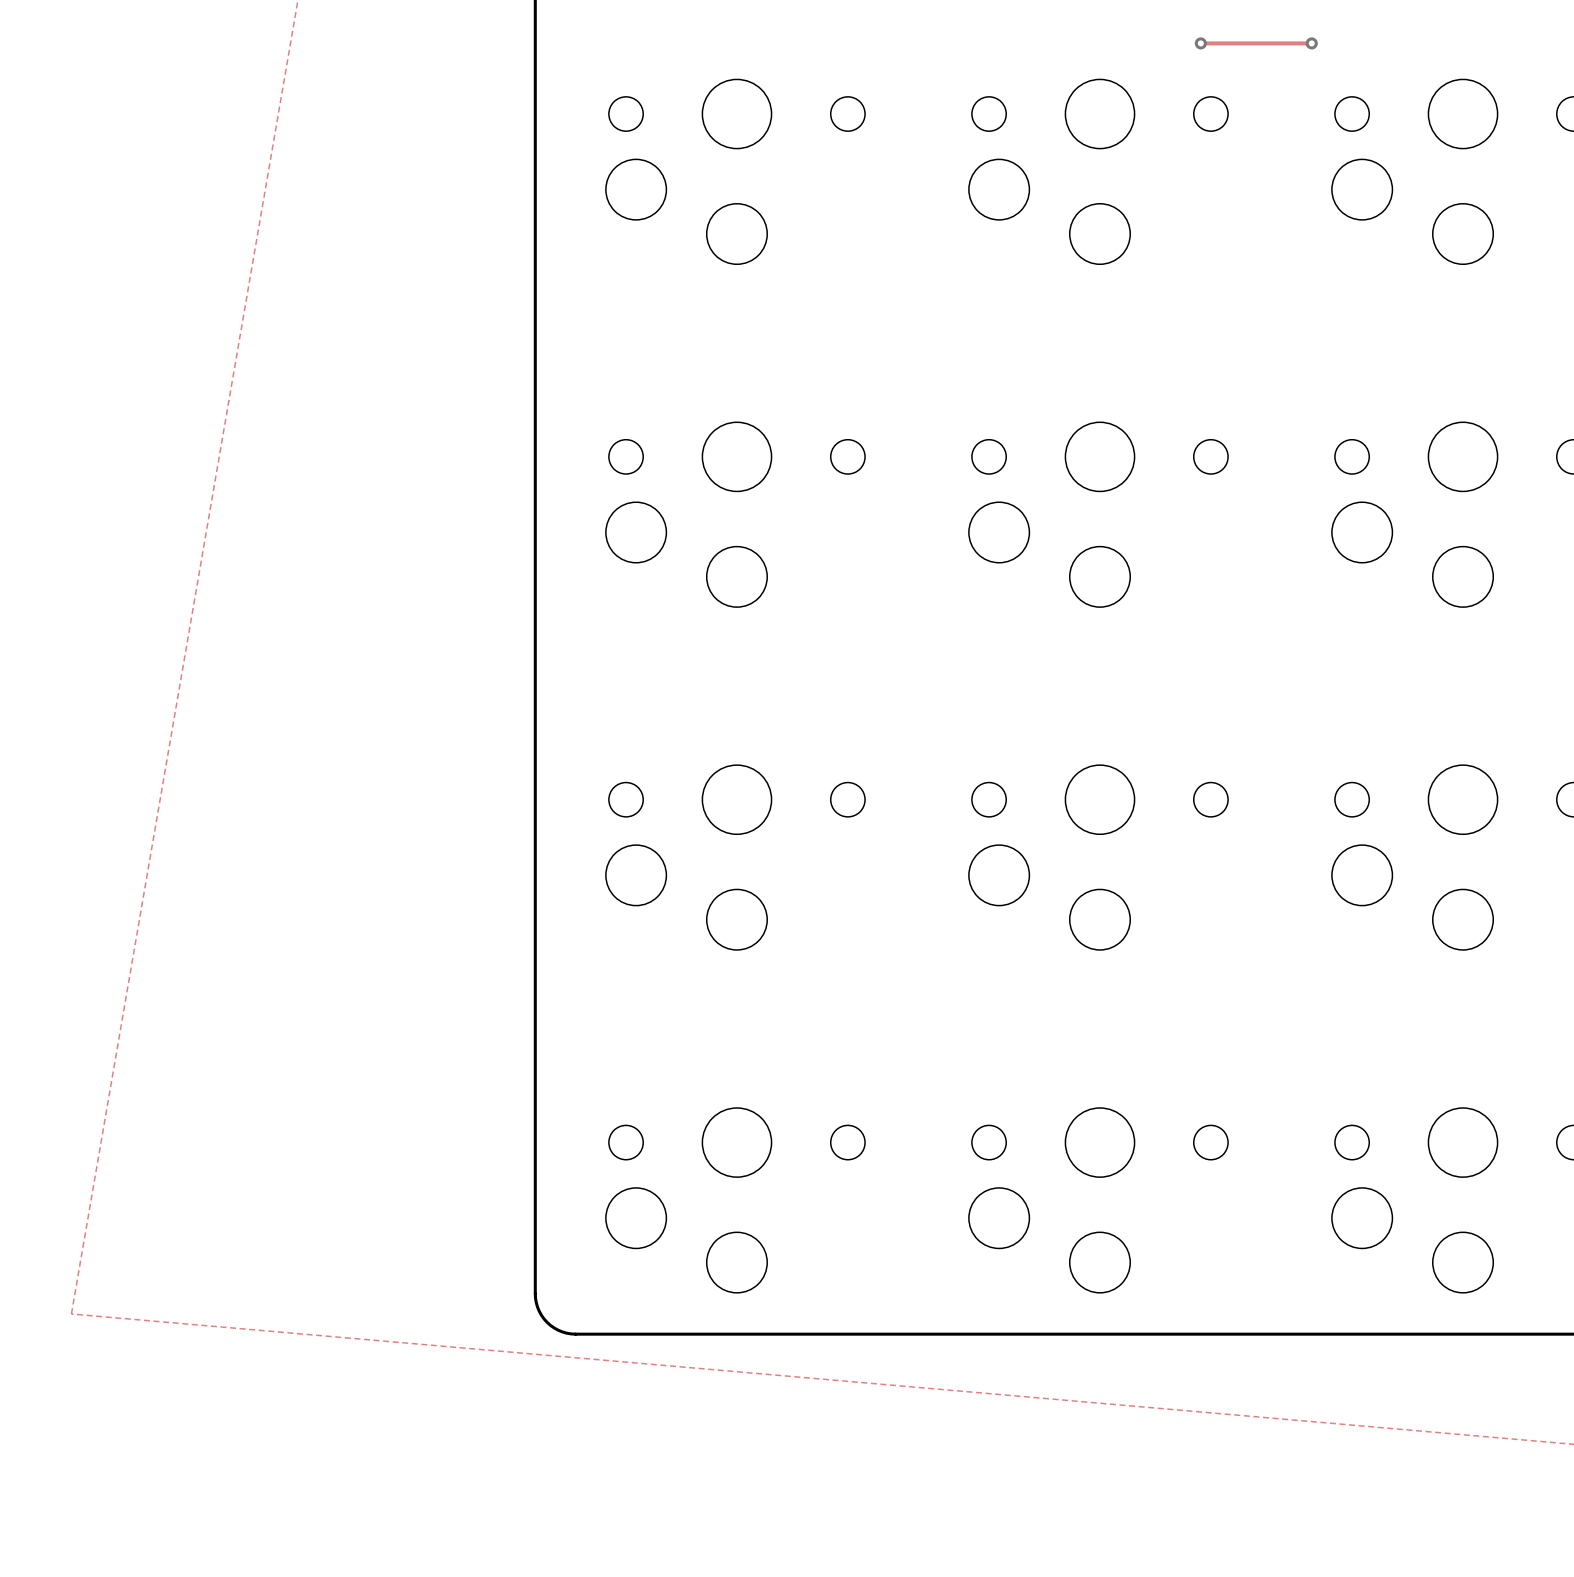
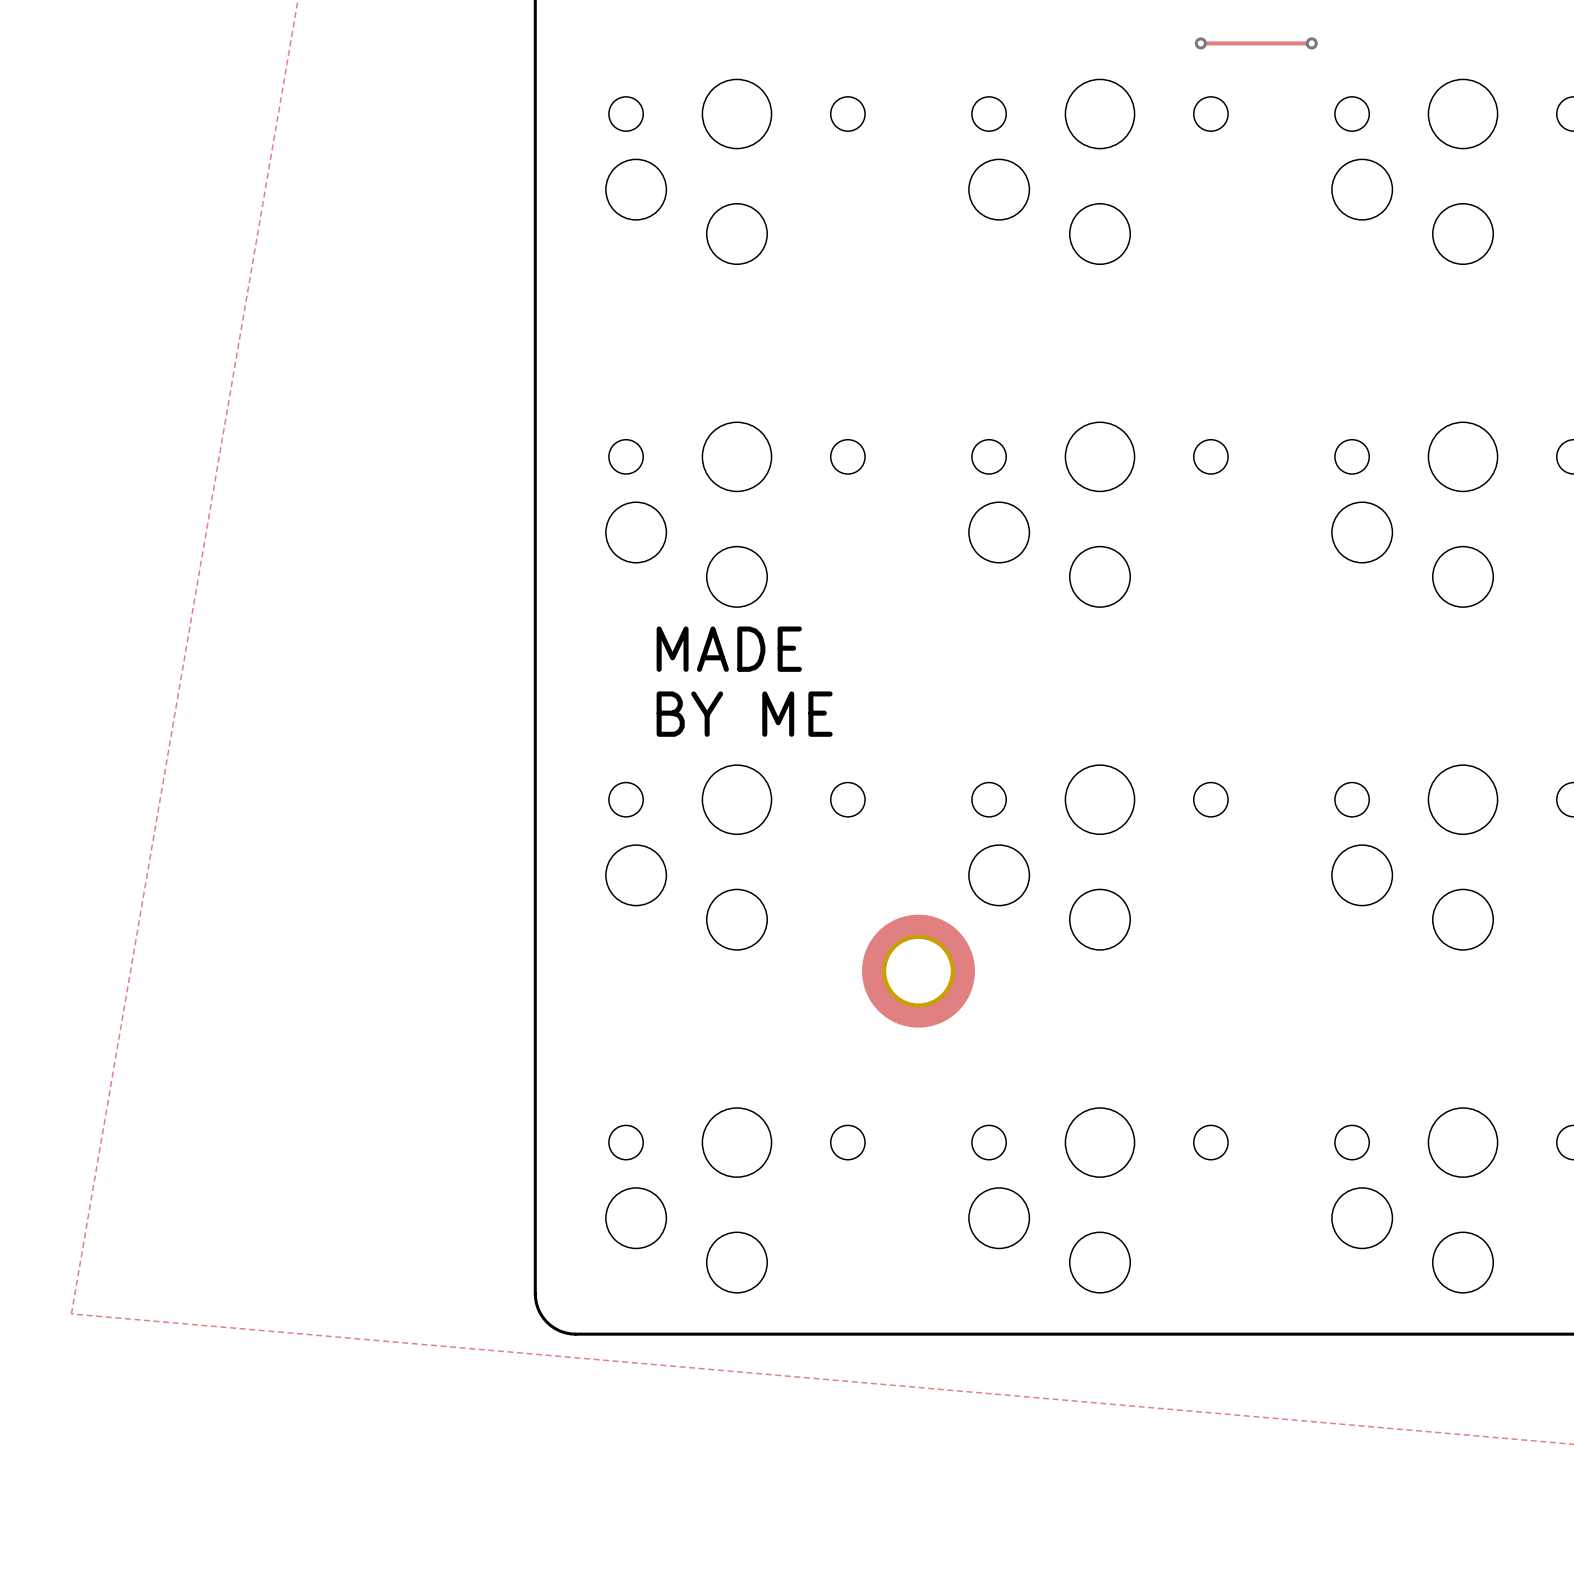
text: none -> MADE (729, 649)
text: none -> BY ME (744, 714)
part: none -> (918, 971)

